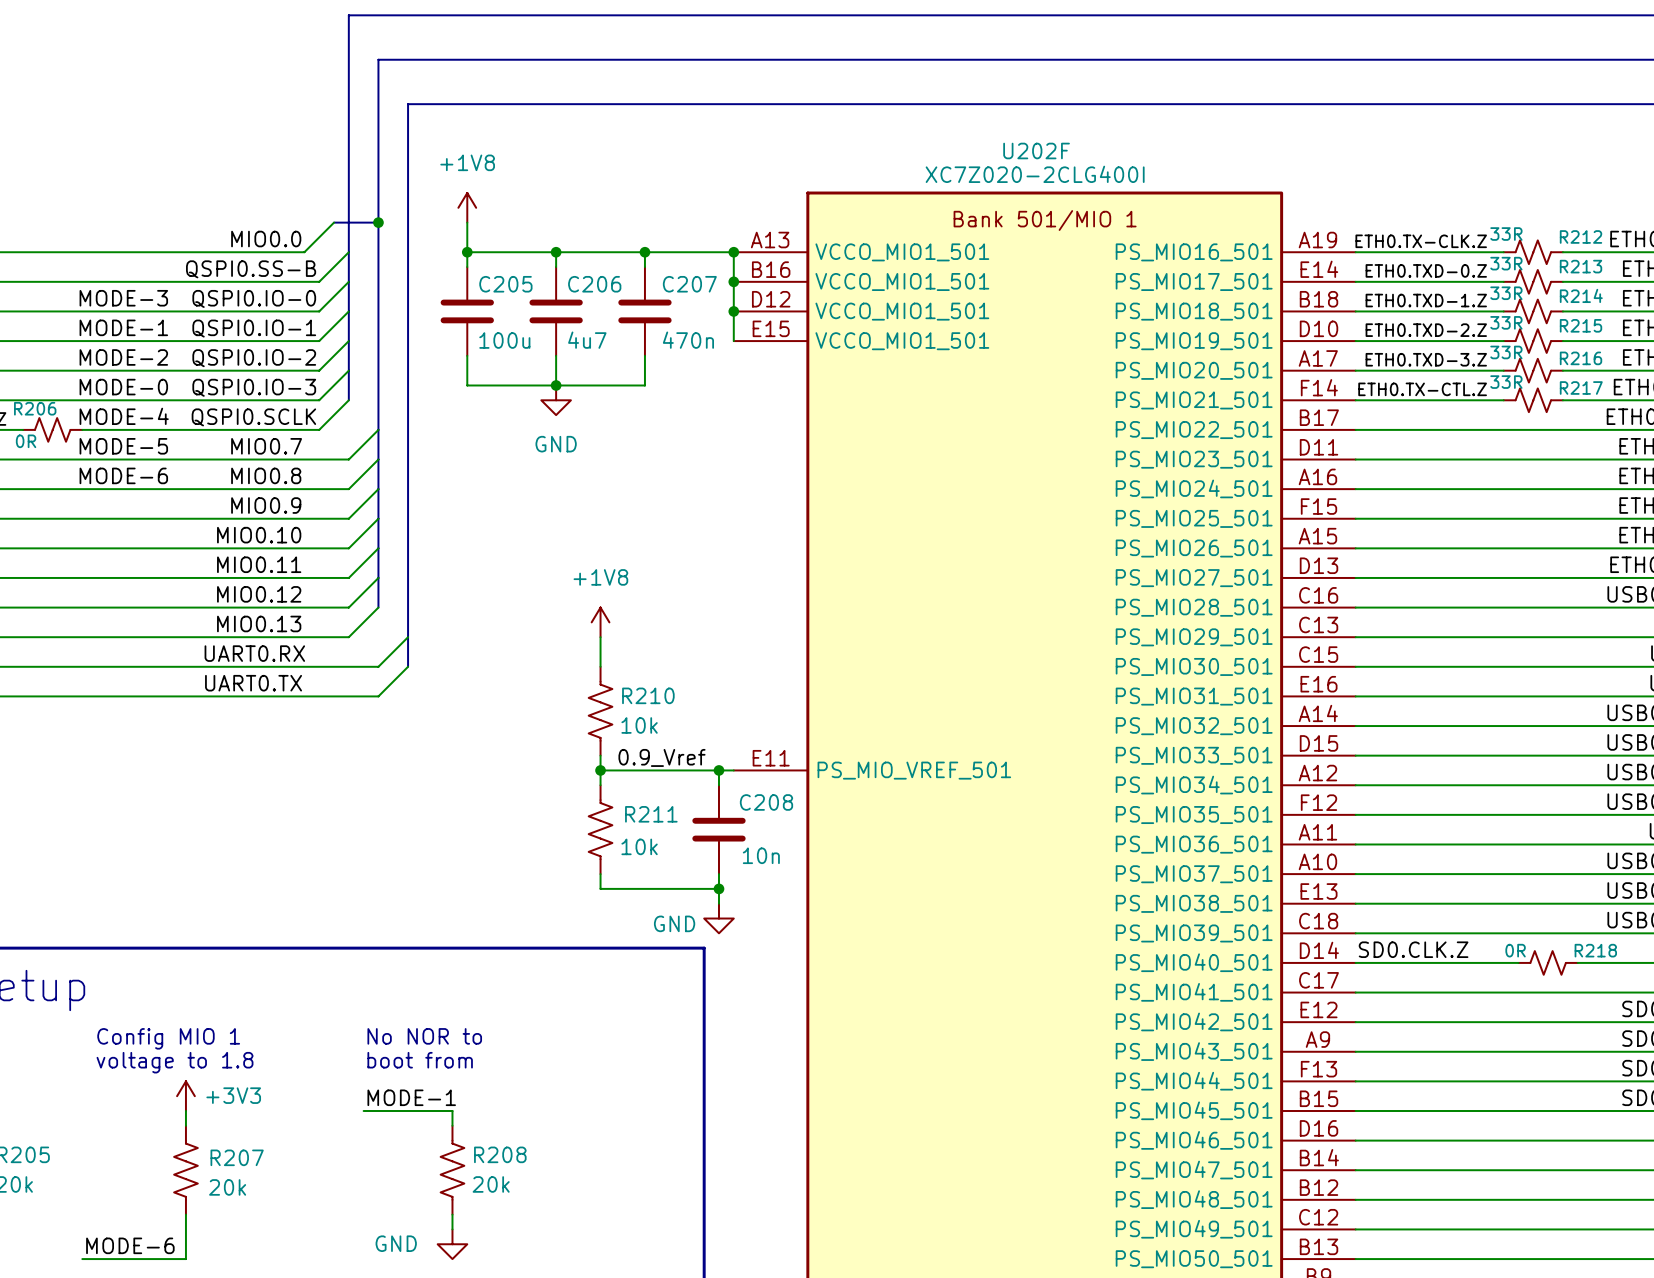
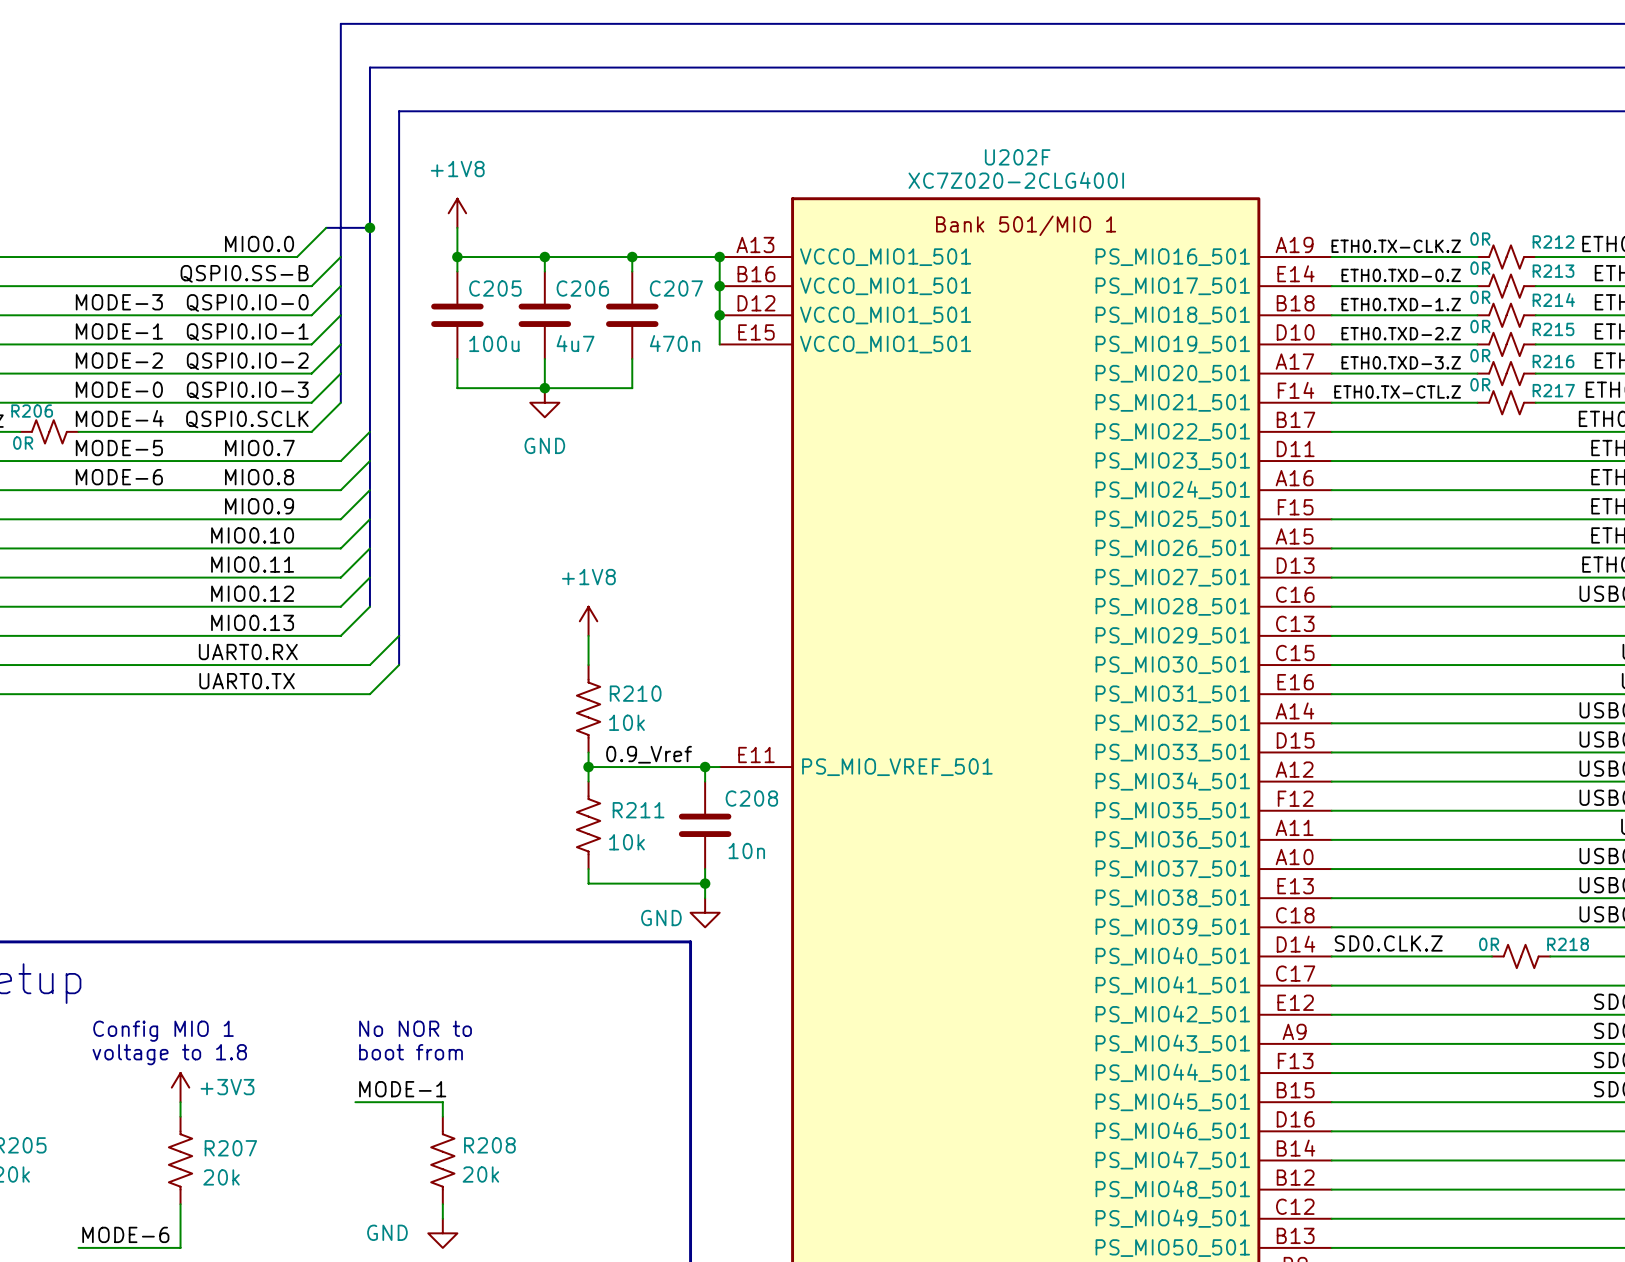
R212 value: 33R (1506, 234) -> 0R (1480, 239)
R213 value: 33R (1506, 263) -> 0R (1480, 268)
R214 value: 33R (1506, 293) -> 0R (1480, 297)
R215 value: 33R (1506, 322) -> 0R (1480, 326)
R216 value: 33R (1506, 352) -> 0R (1480, 355)
R217 value: 33R (1506, 382) -> 0R (1480, 384)

